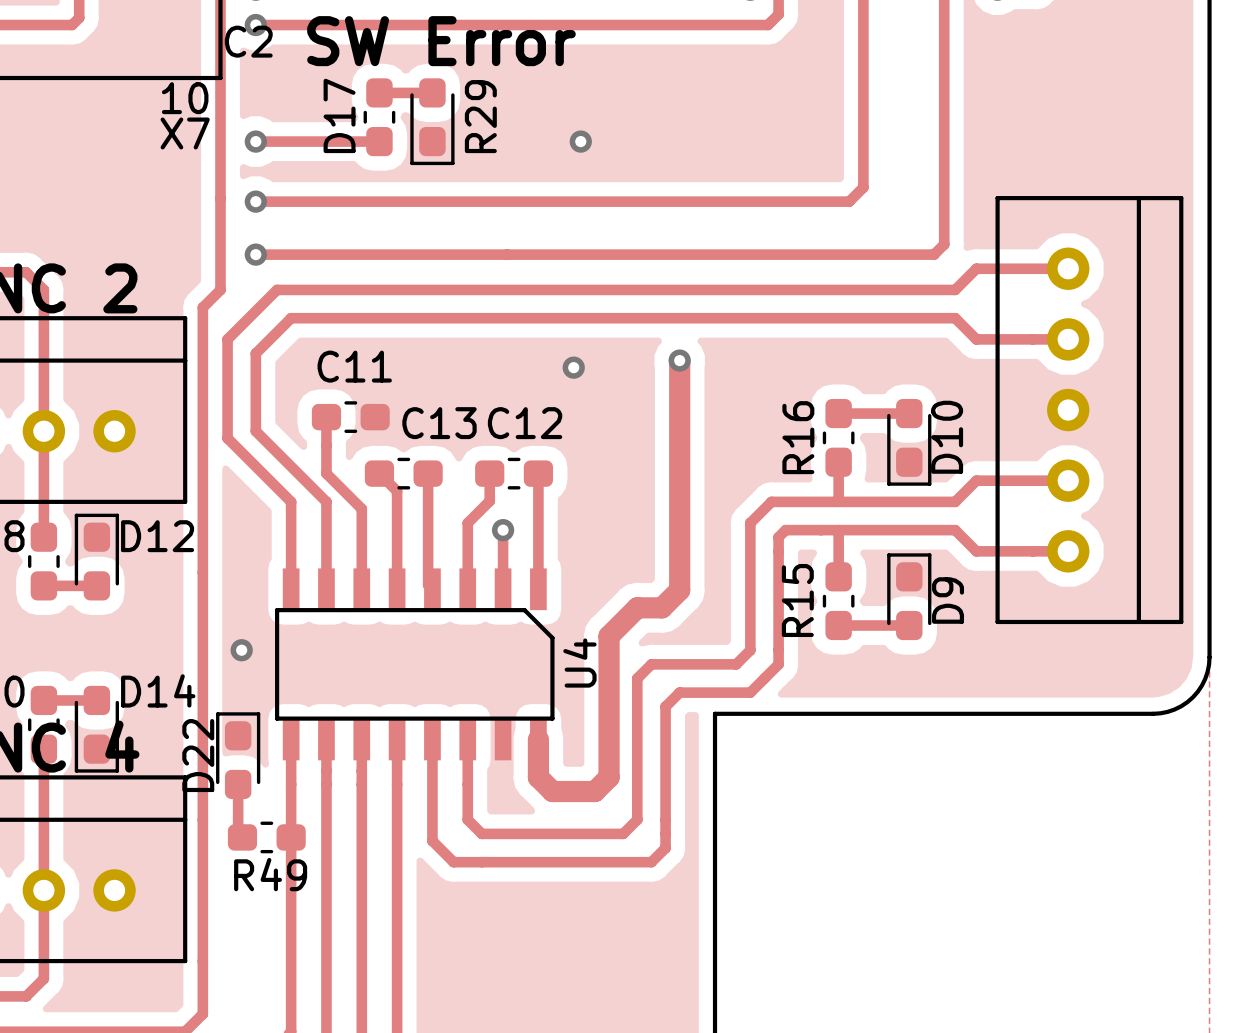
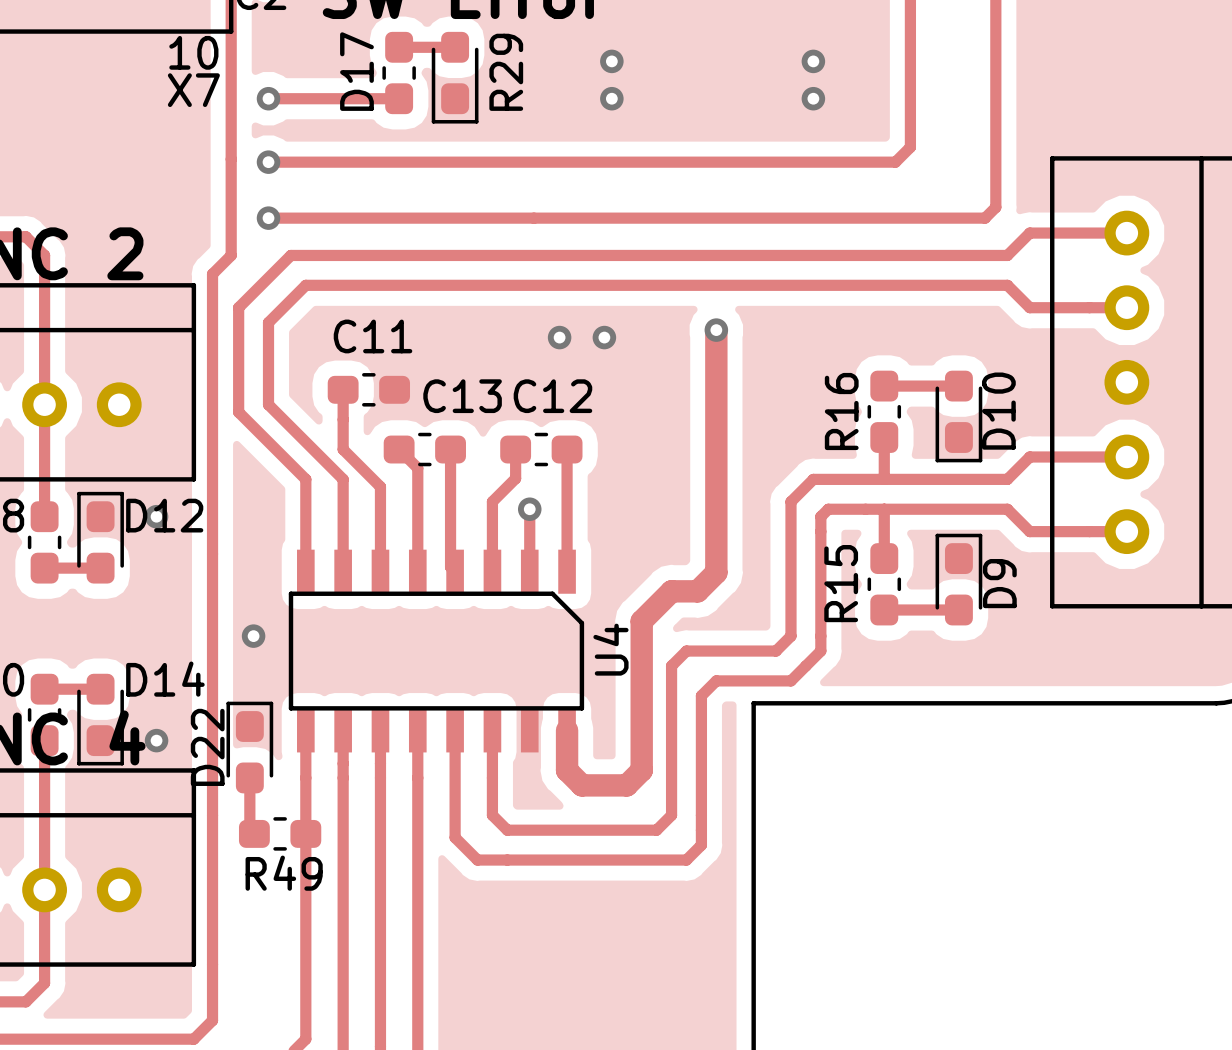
via: none -> (611, 61)
via: none -> (813, 61)
via: none -> (813, 98)
via: none -> (559, 337)
via: none -> (156, 516)
via: none -> (156, 740)

